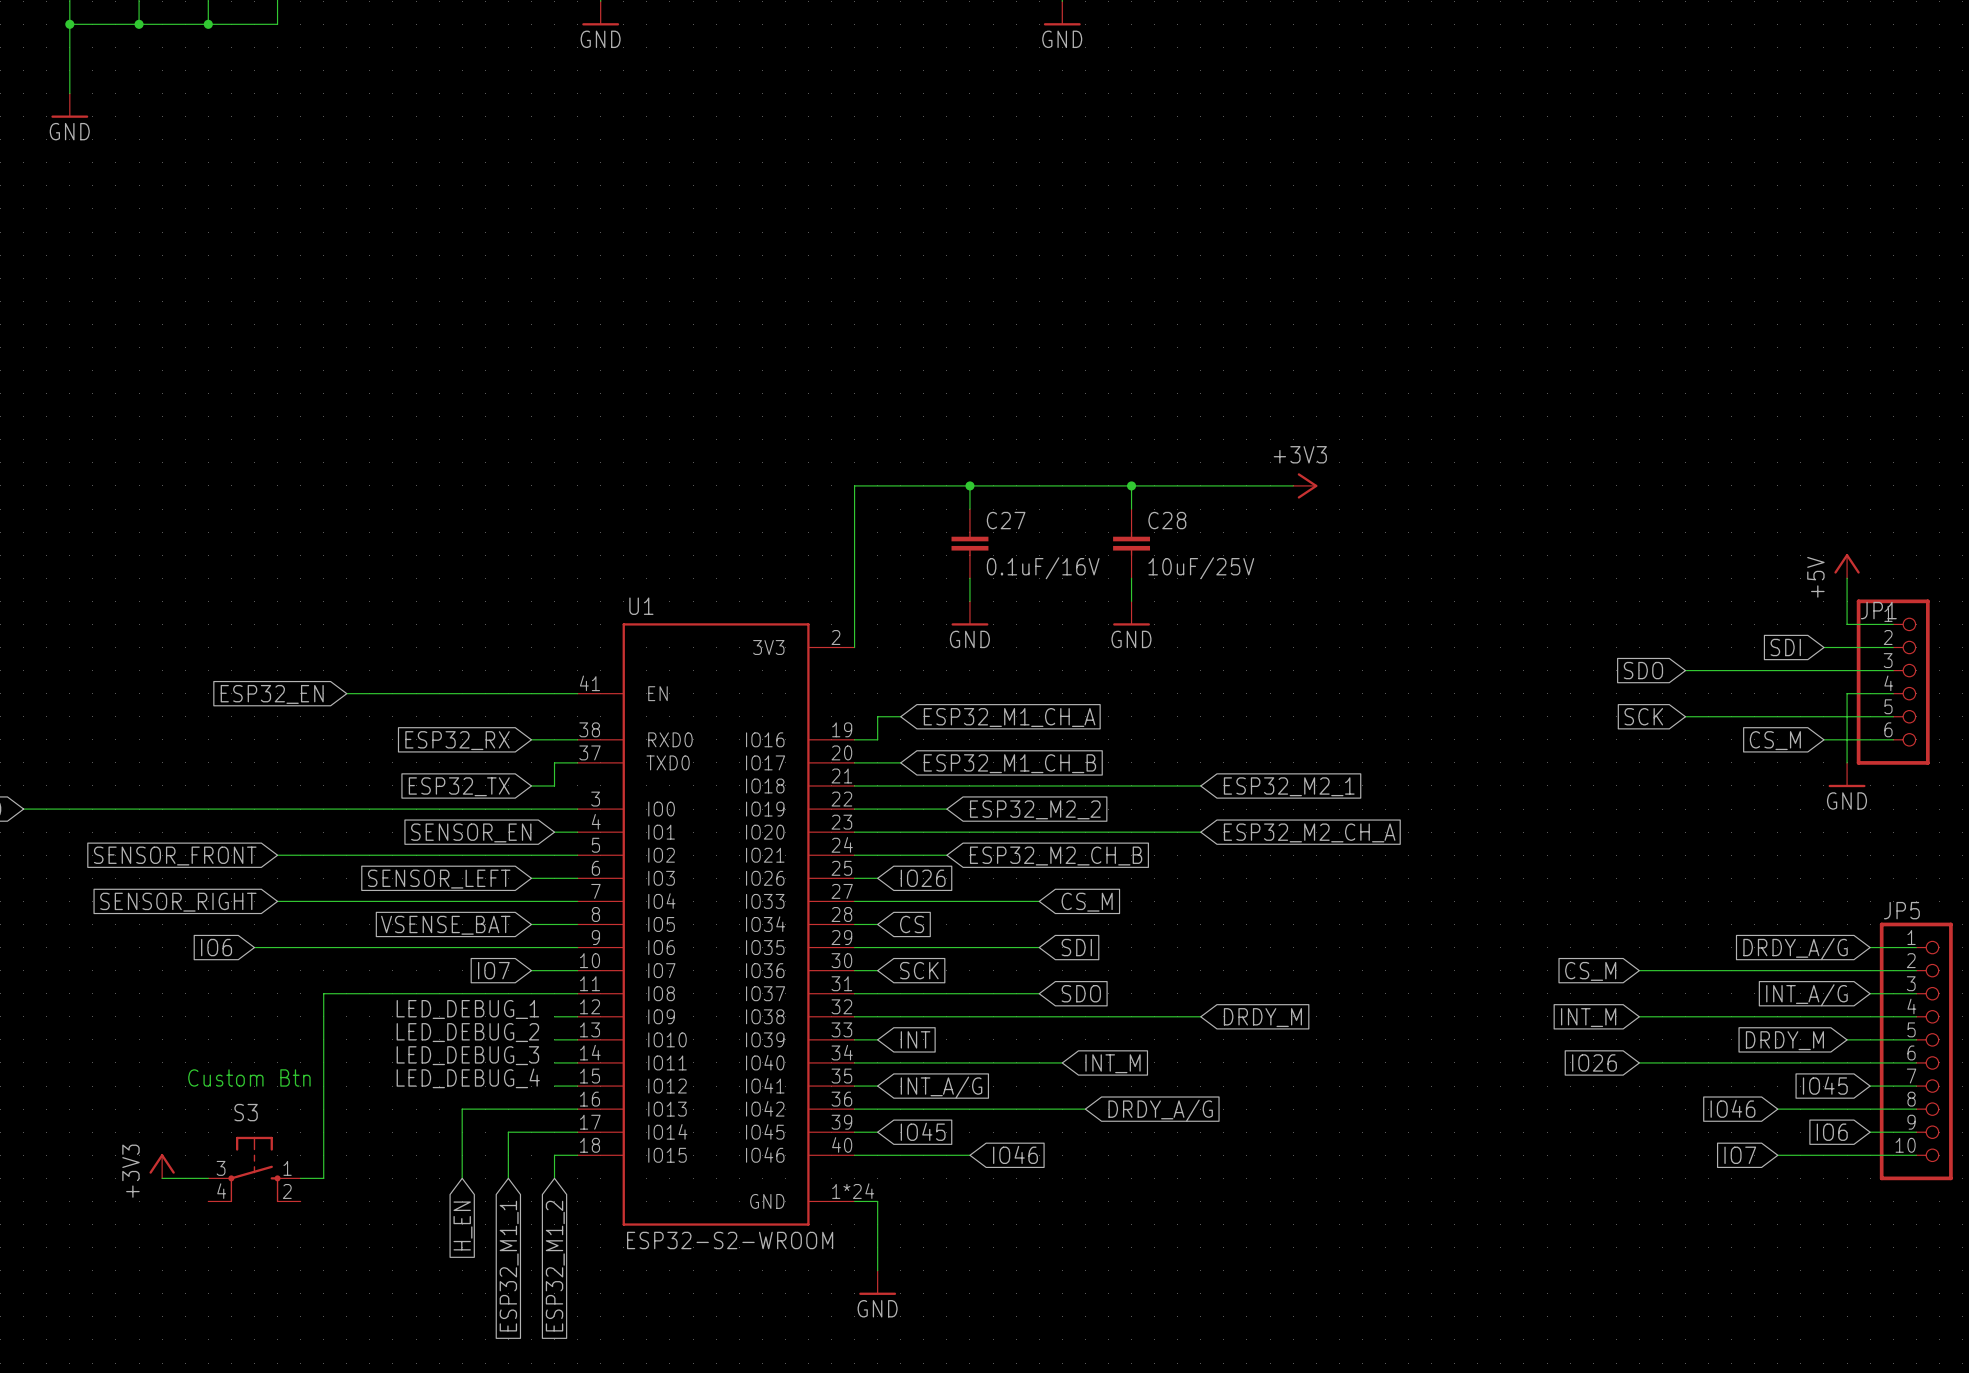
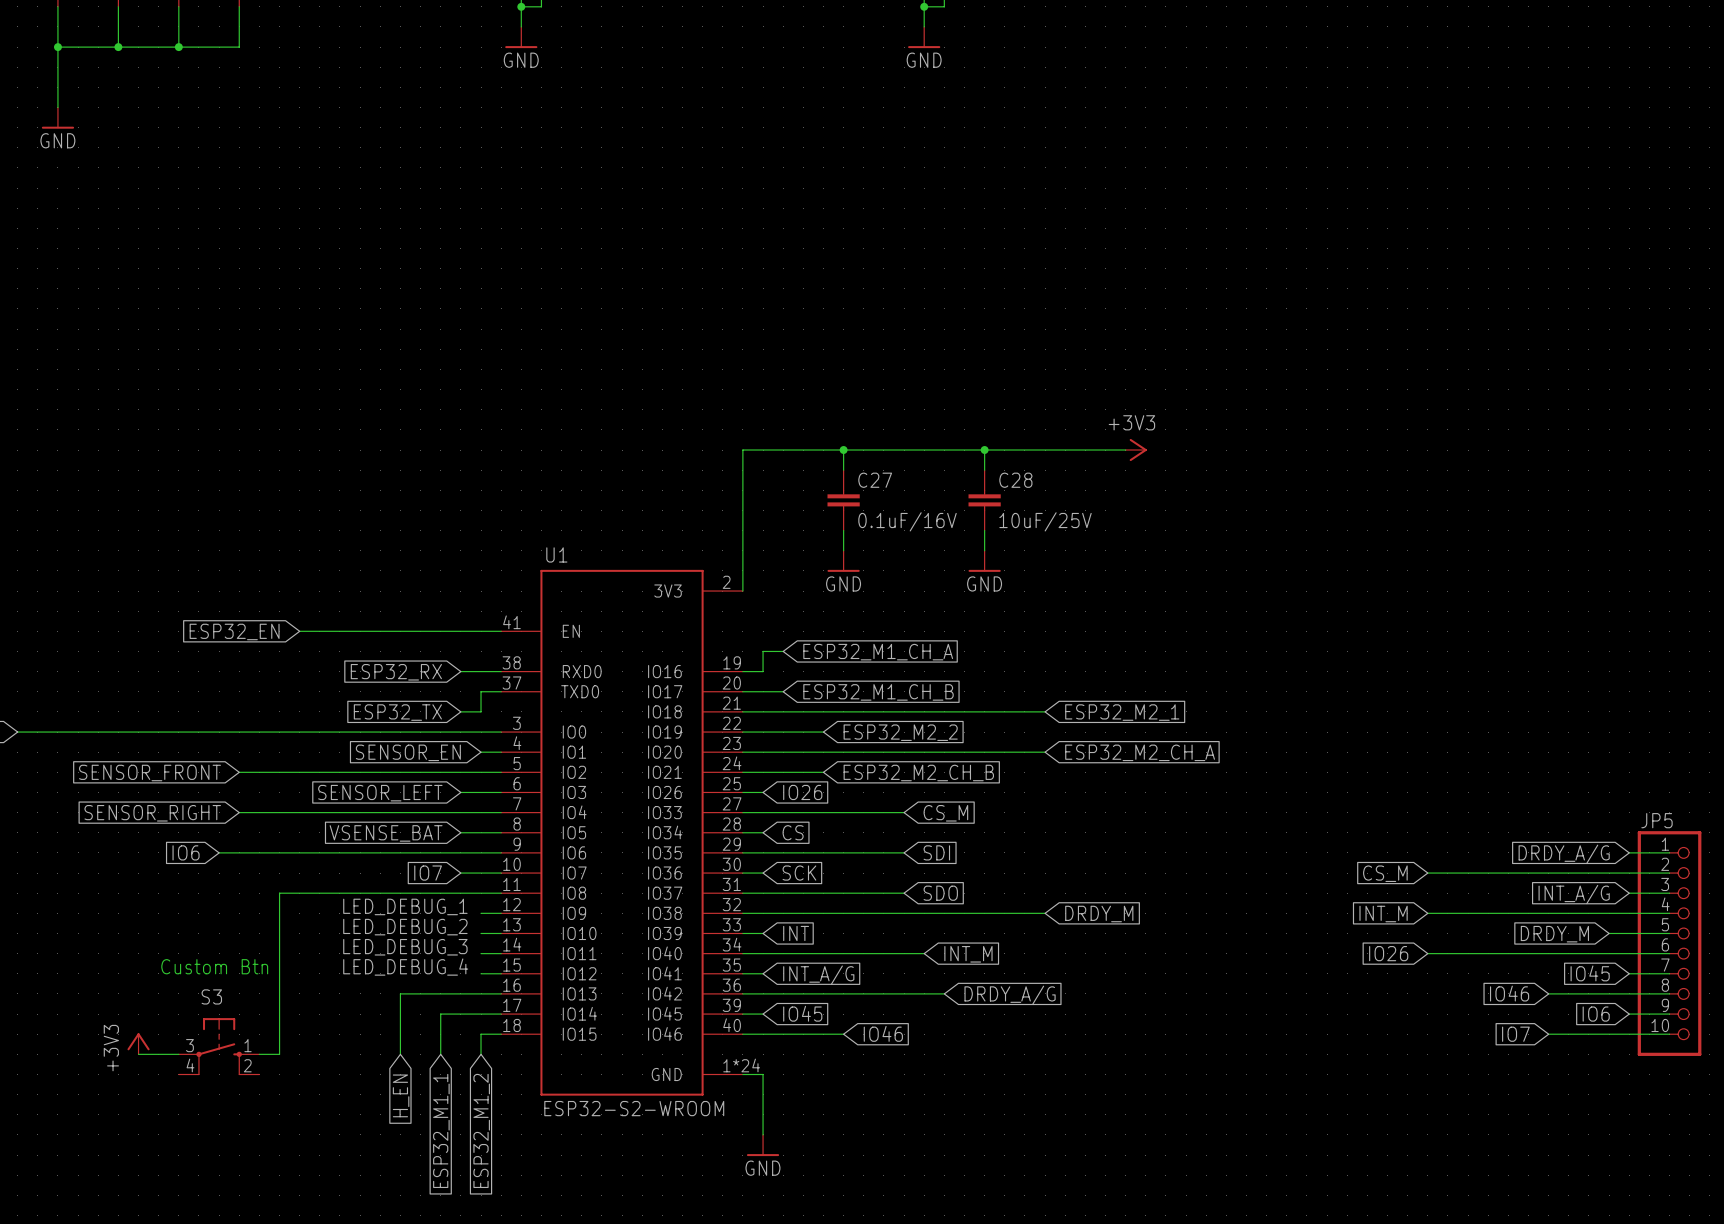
power symbol: +5V (1847, 566) -> none
wire: (1847, 578) (1847, 624) (1893, 624) -> none
global label: SDI (1785, 647) -> none
wire: (1823, 647) (1893, 647) -> none
global label: SDO (1643, 670) -> none
wire: (1685, 670) (1893, 670) -> none
JP1: (1893, 682) -> none
wire: (1893, 693) (1847, 693) (1847, 762) -> none
global label: SCK (1643, 716) -> none
wire: (1685, 716) (1893, 716) -> none
wire: (1823, 739) (1893, 739) -> none
global label: CS_M (1775, 740) -> none
power symbol: GND (1847, 775) -> none

